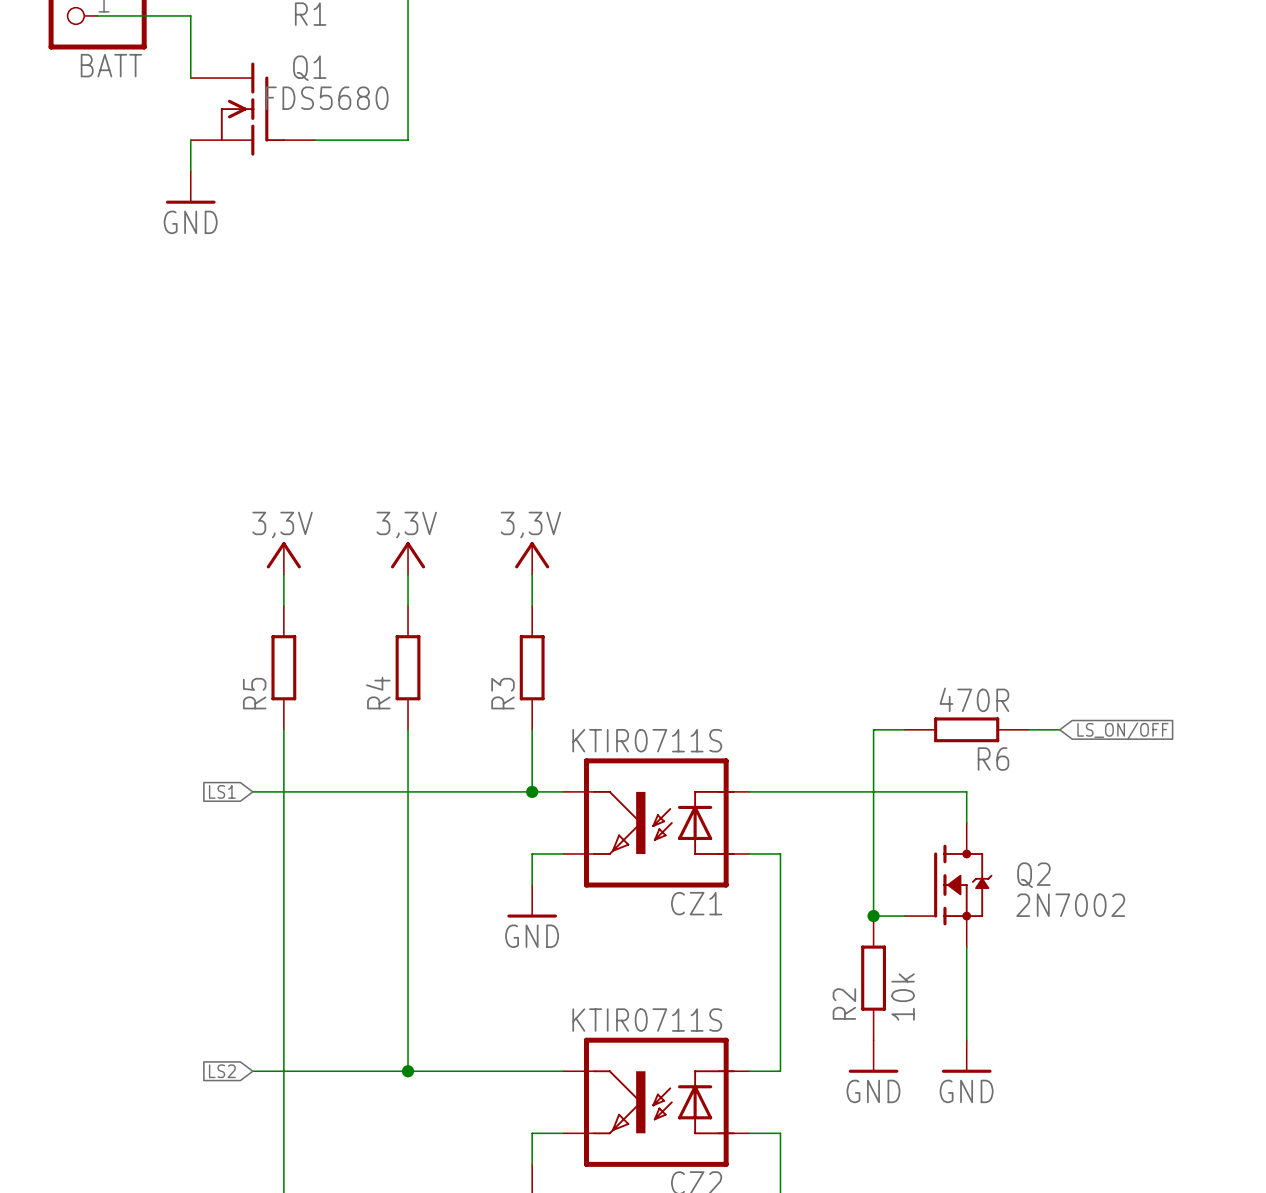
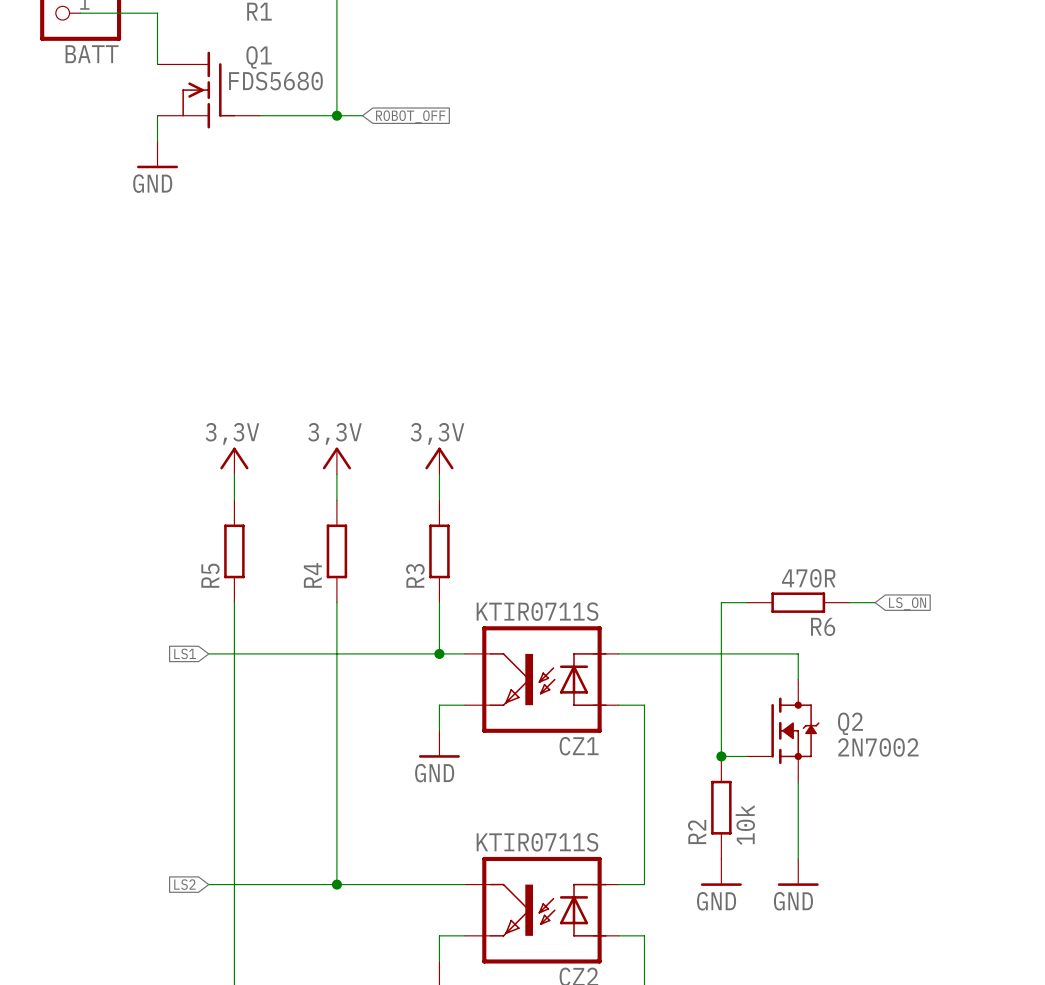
wire: none -> (336, 115) (362, 115)
junction: none -> (336, 115)
global label: none -> ROBOT_OFF (410, 116)
global label: LS_ON/OFF (1122, 731) -> LS_ON (907, 603)

